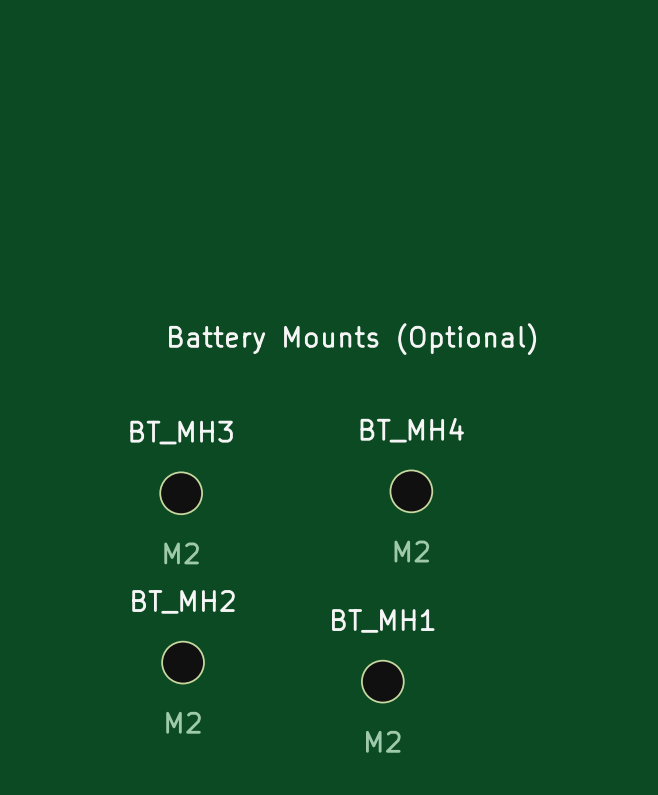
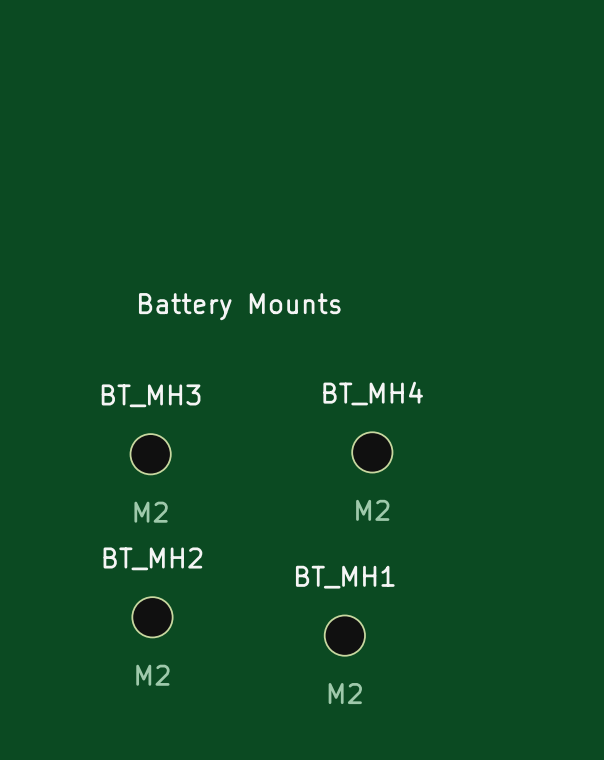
text: Battery Mounts (Optional) (352, 339) -> Battery Mounts (239, 306)

